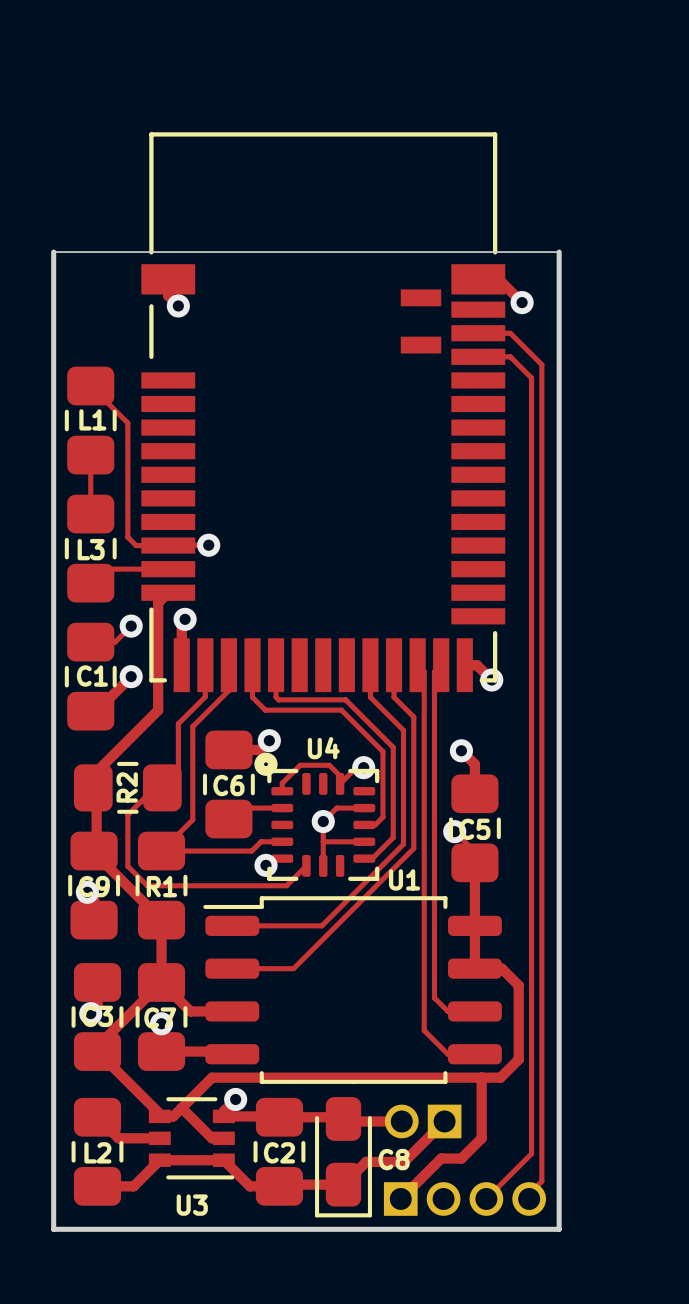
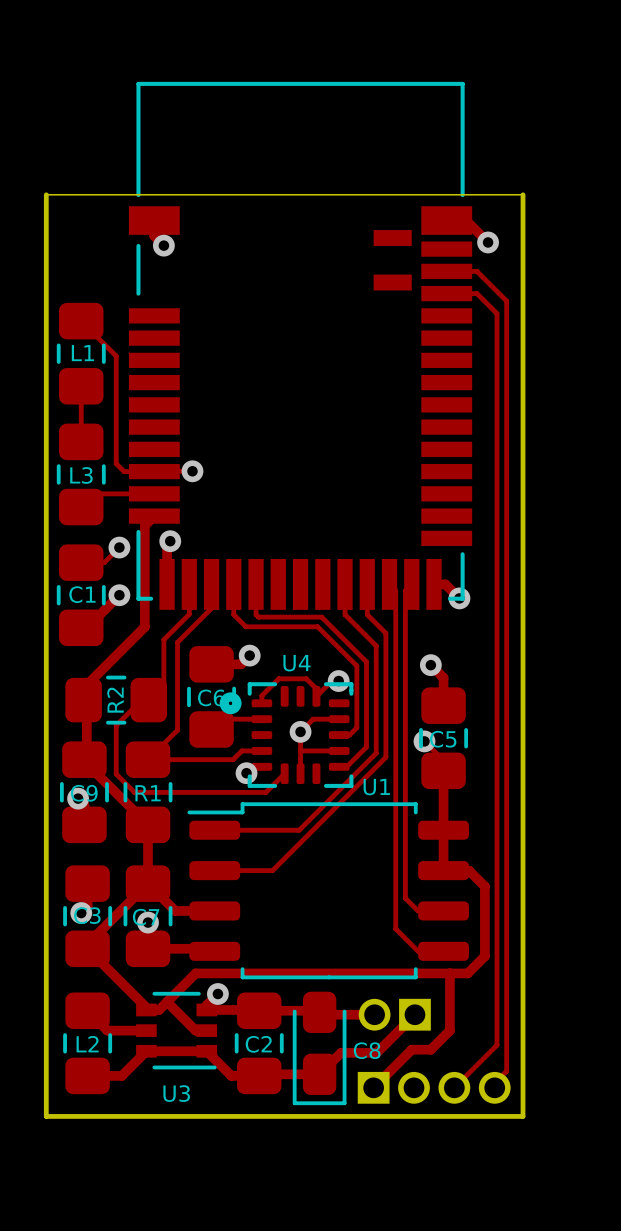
U4 footprint: [254, 752, 380, 881] -> [219, 682, 354, 788]

